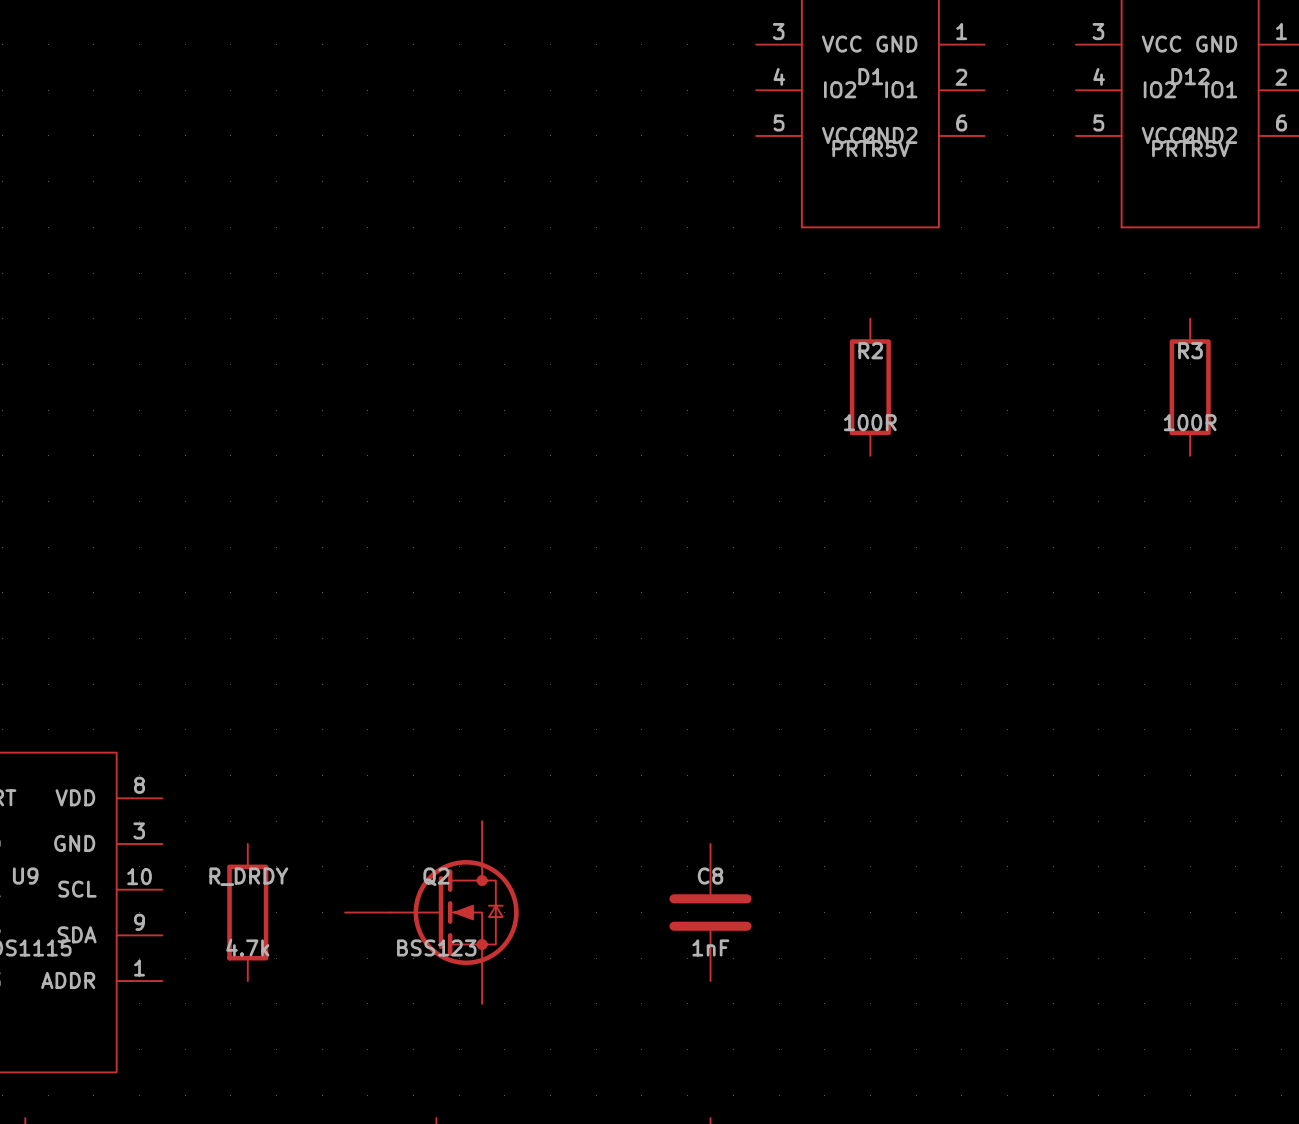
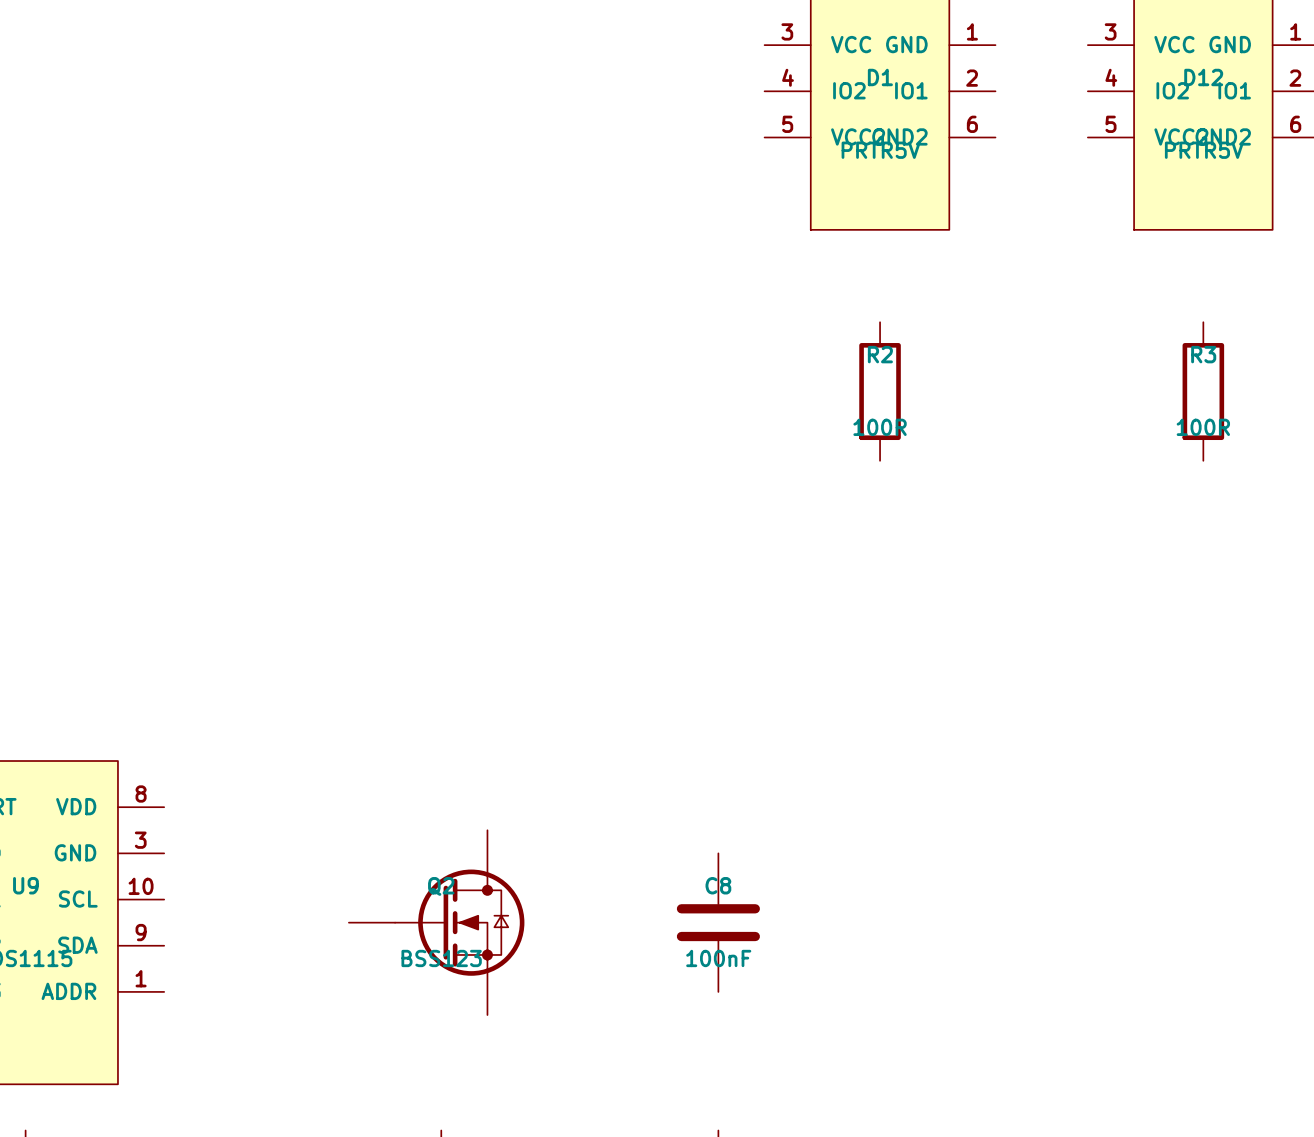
R_DRDY: 4.7k (247, 912) -> none
C8 value: 1nF (710, 947) -> 100nF (718, 958)

